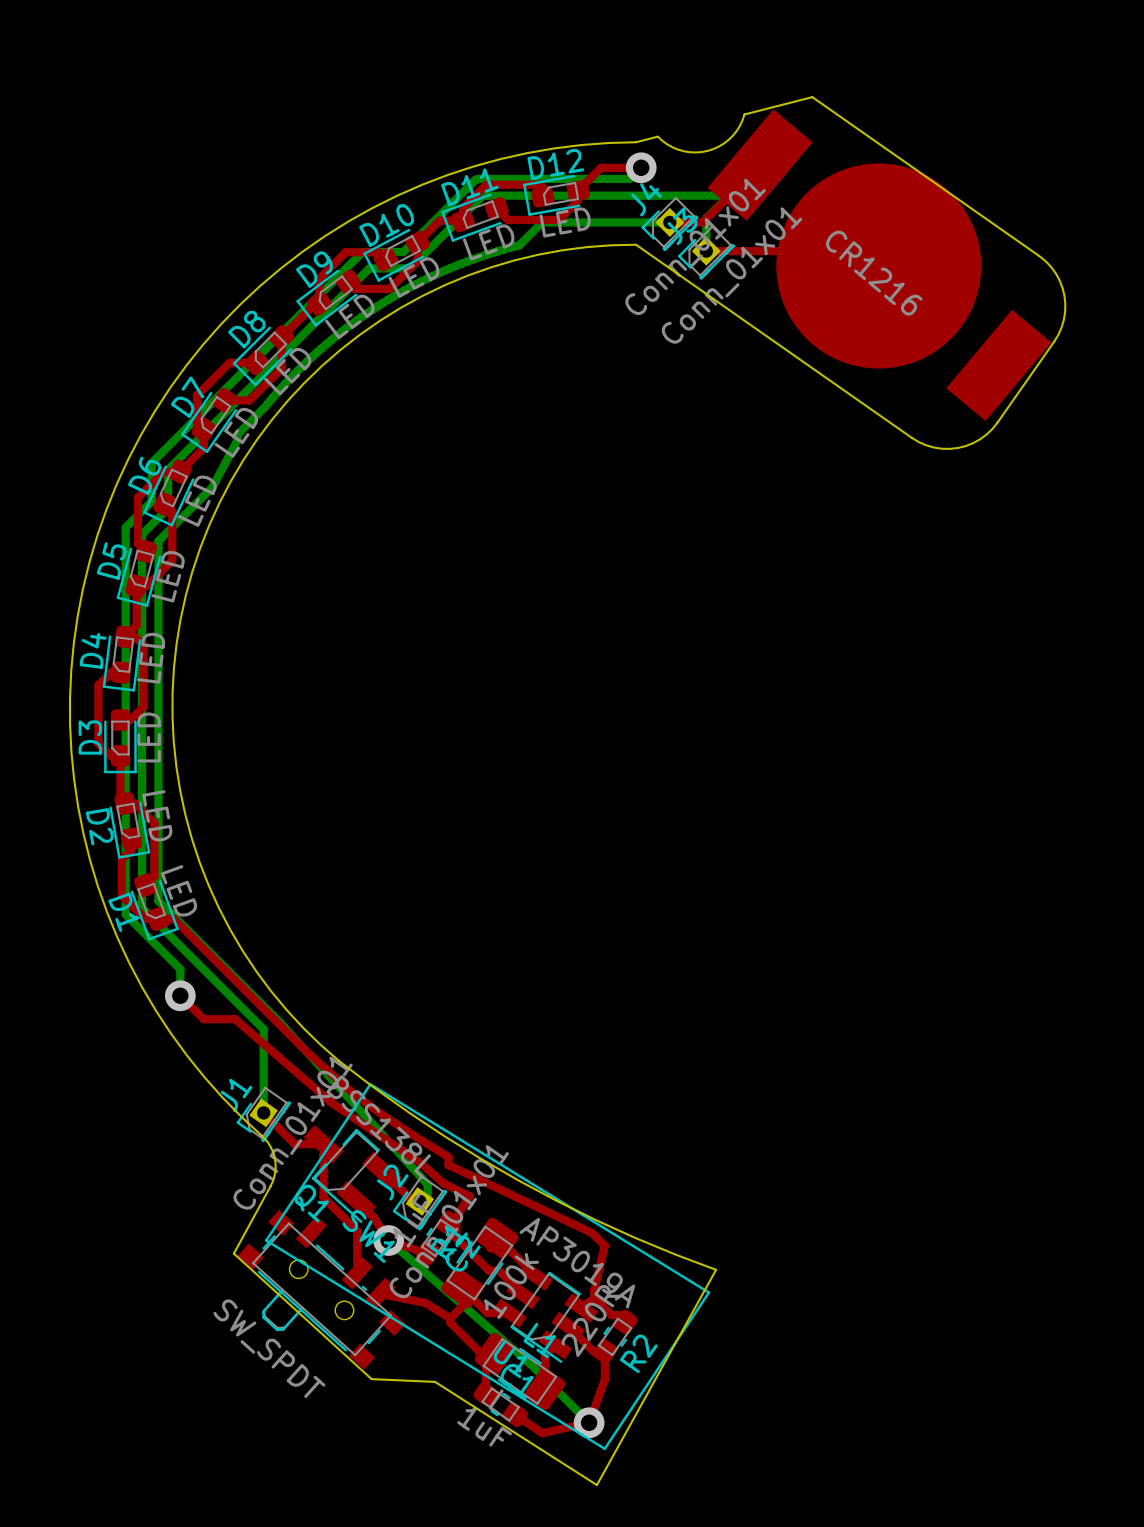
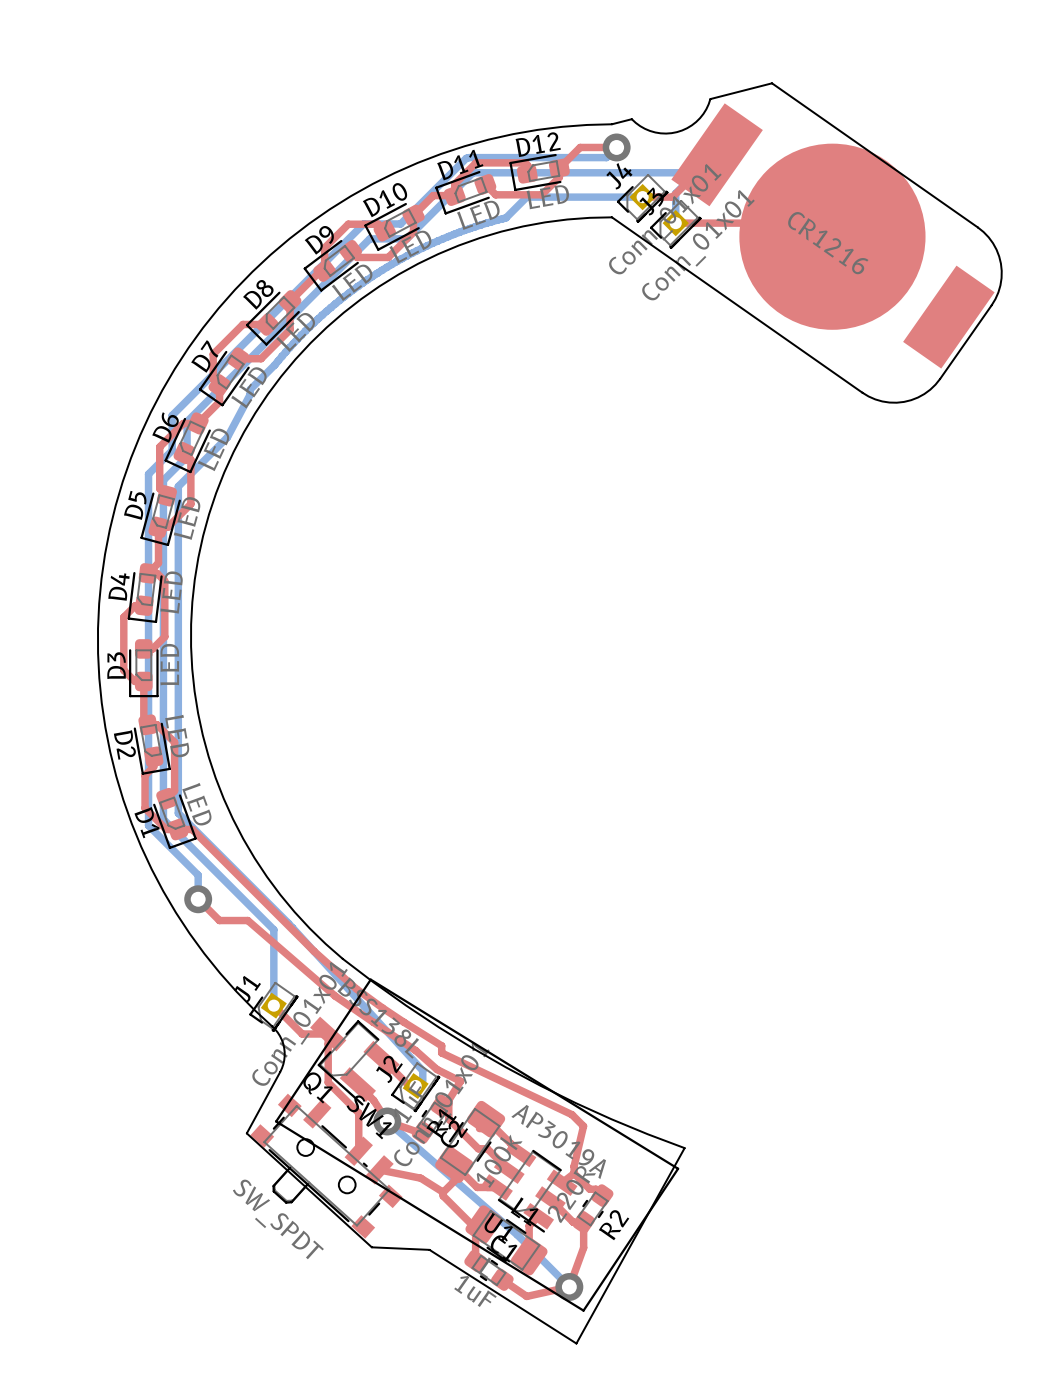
part rotation: 0° (879, 265) -> 5° counterclockwise (832, 235)

